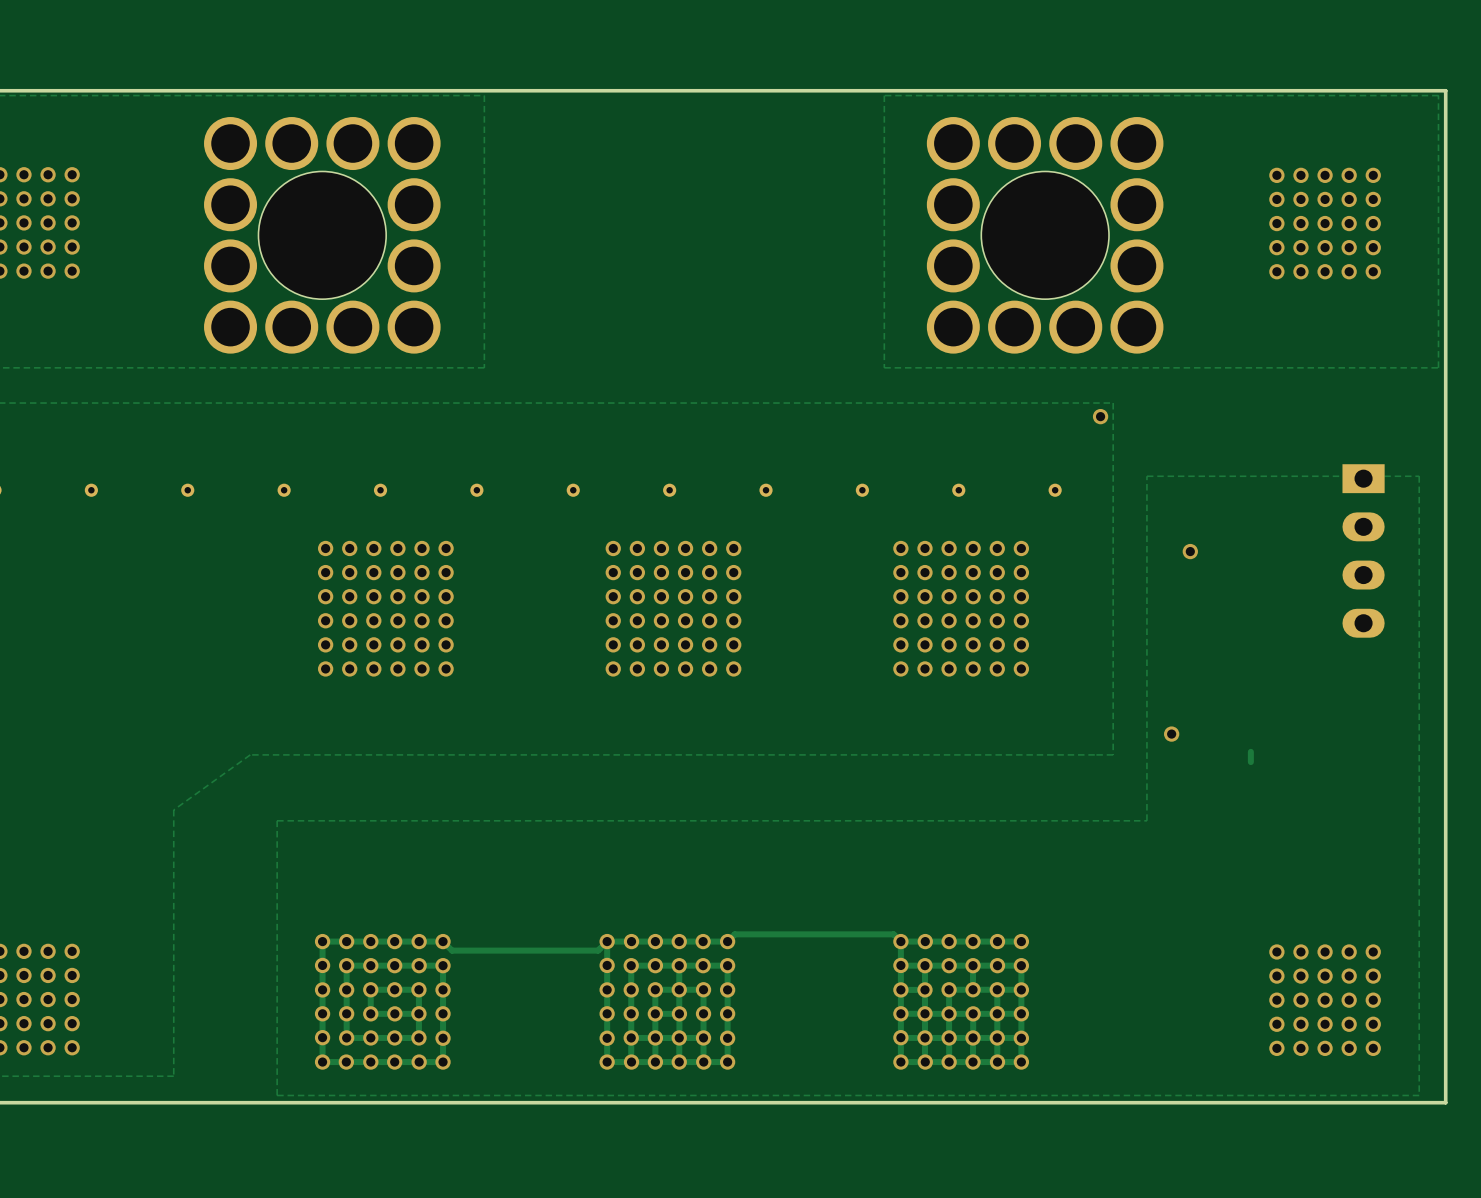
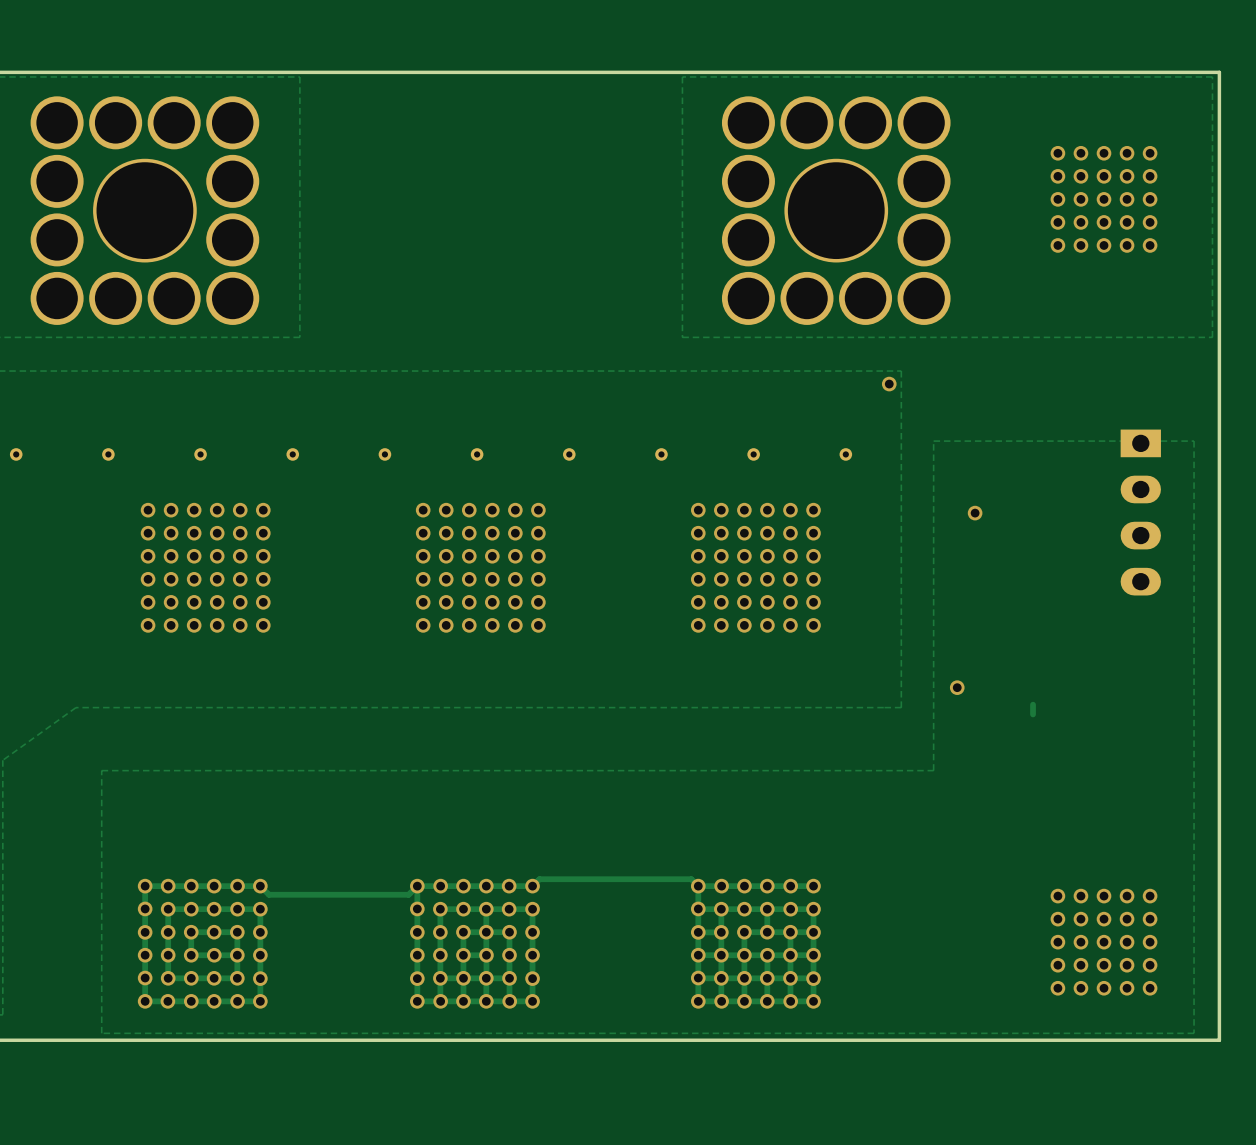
part footprint: [204, 117, 441, 354] -> [30, 96, 260, 325]
part footprint: [926, 117, 1164, 354] -> [721, 96, 951, 325]

